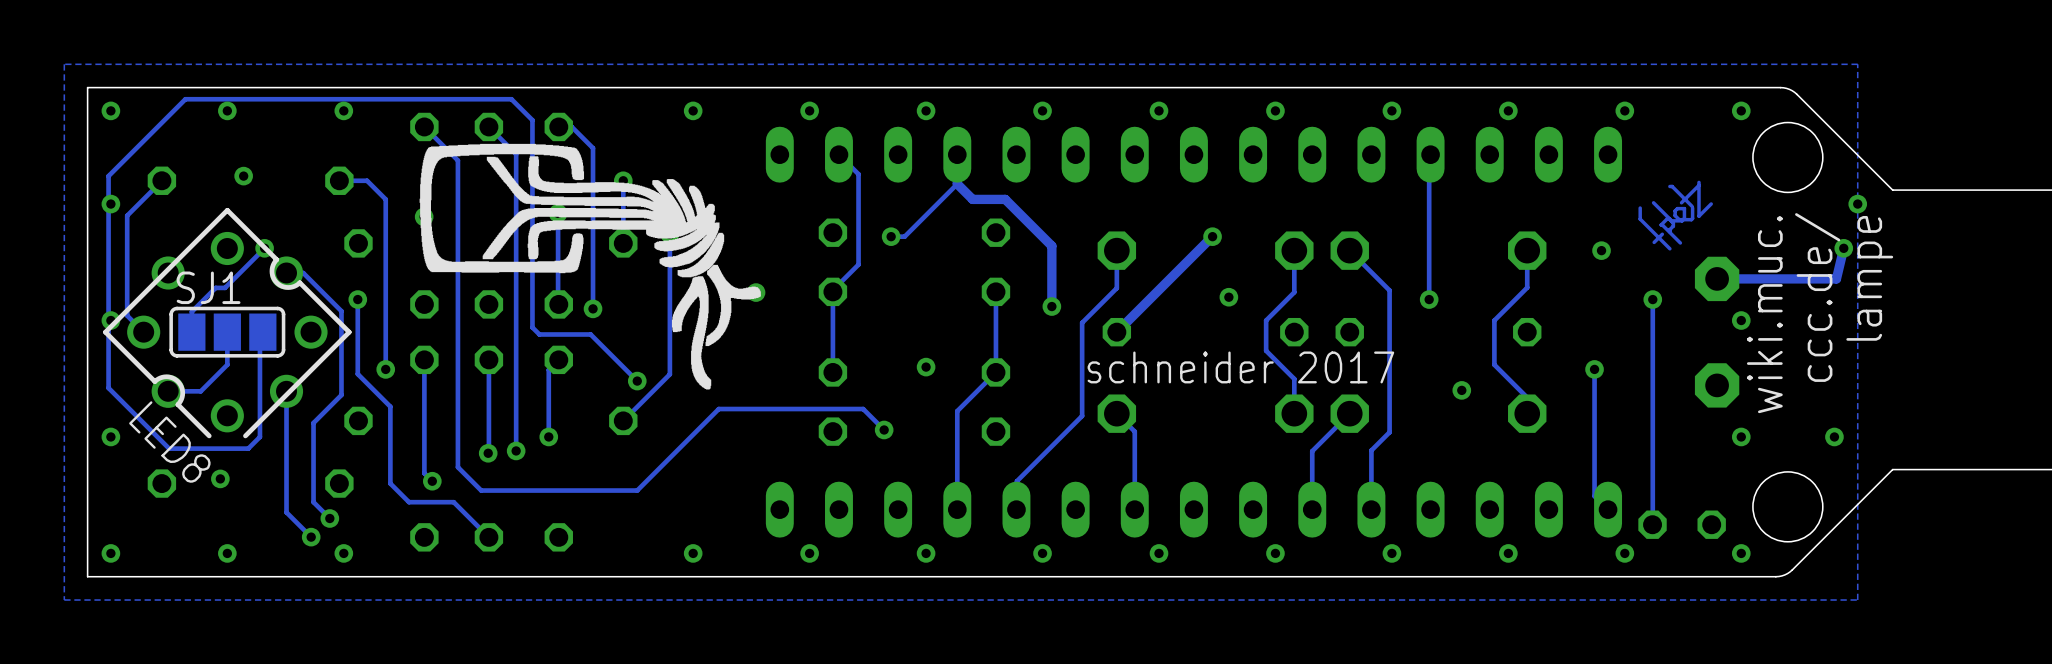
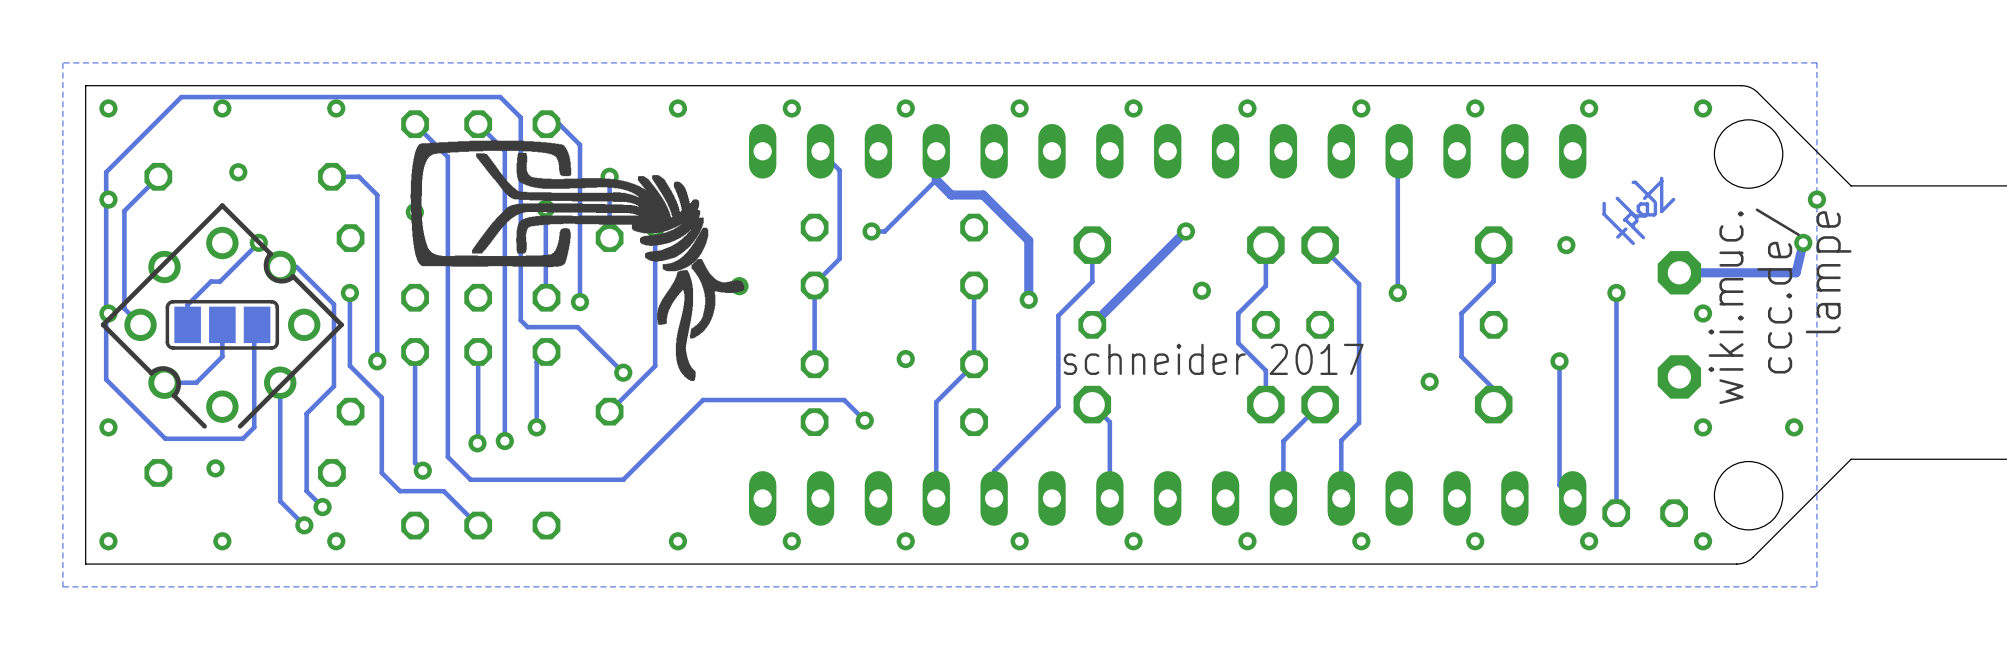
SJ1 name: SJ1 (208, 287) -> none
LED8 name: LED8 (169, 442) -> none

